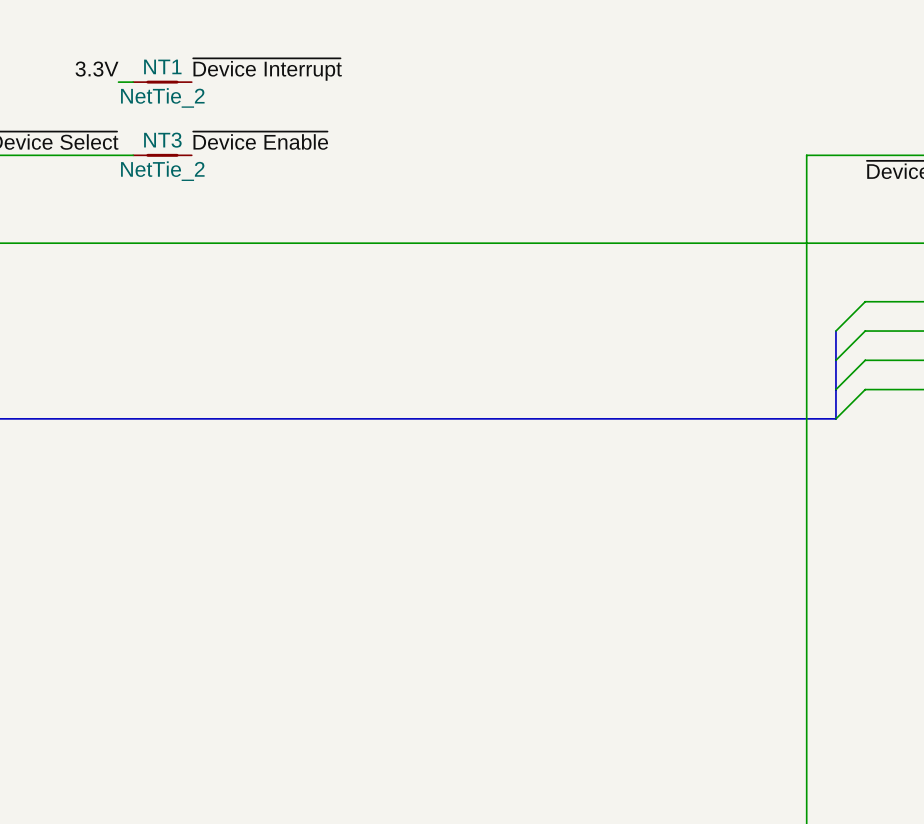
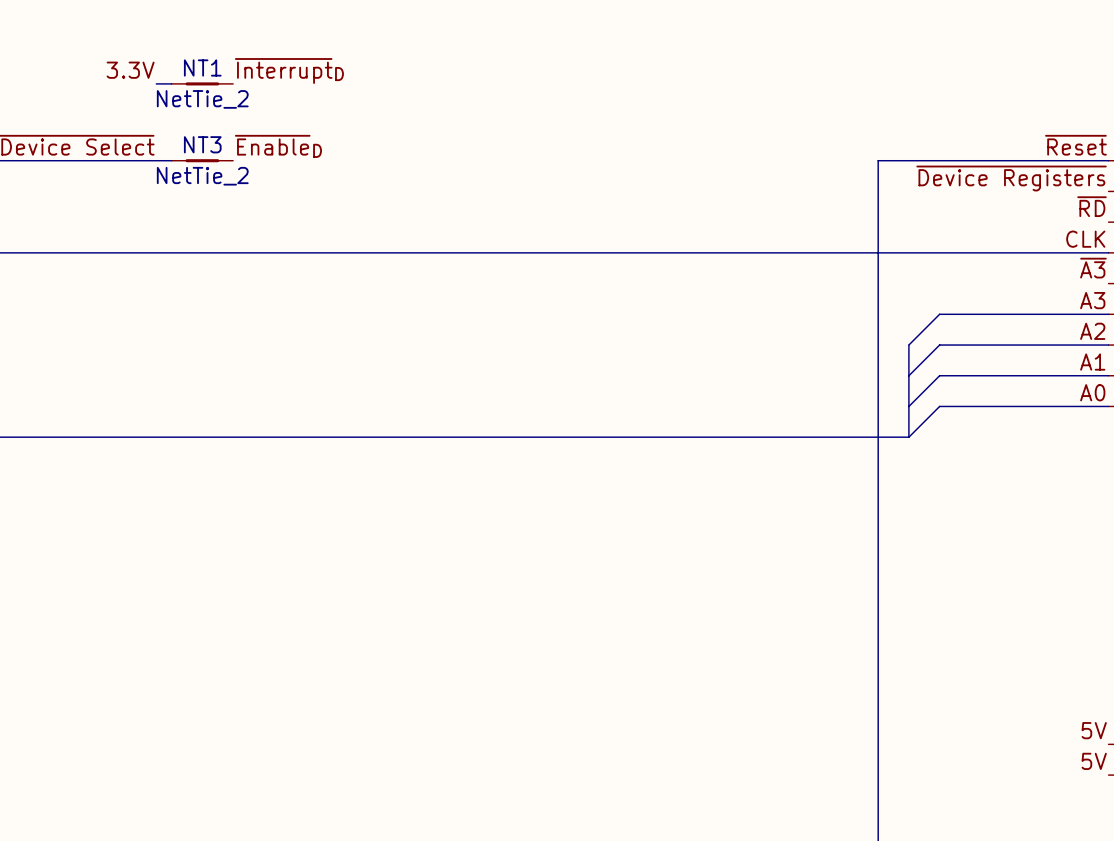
label: ~{Device Interrupt} (267, 69) -> ~{Interrupt}D (289, 71)
label: ~{Device Enable} (260, 140) -> ~{Enable}D (278, 146)

